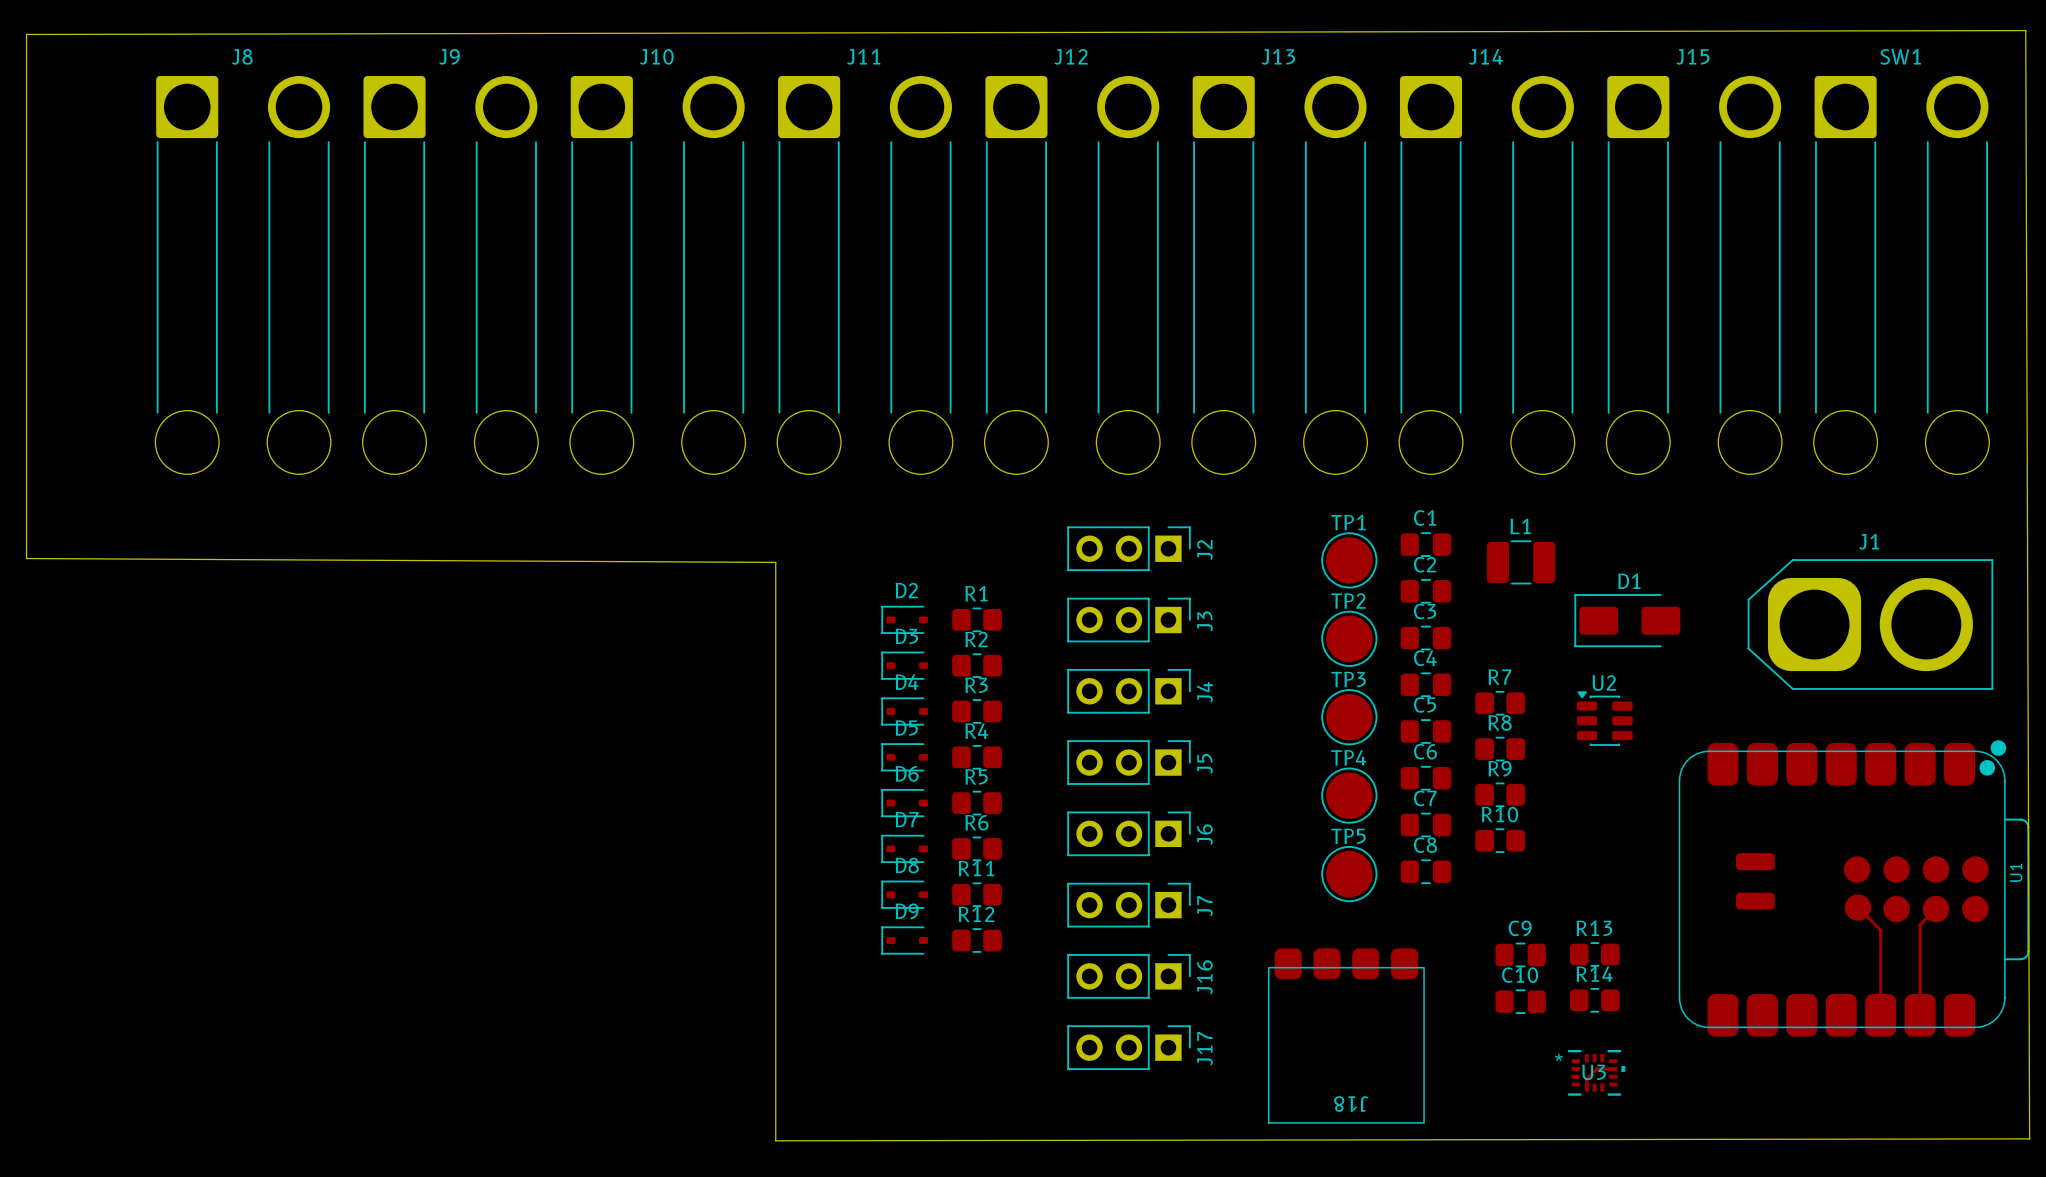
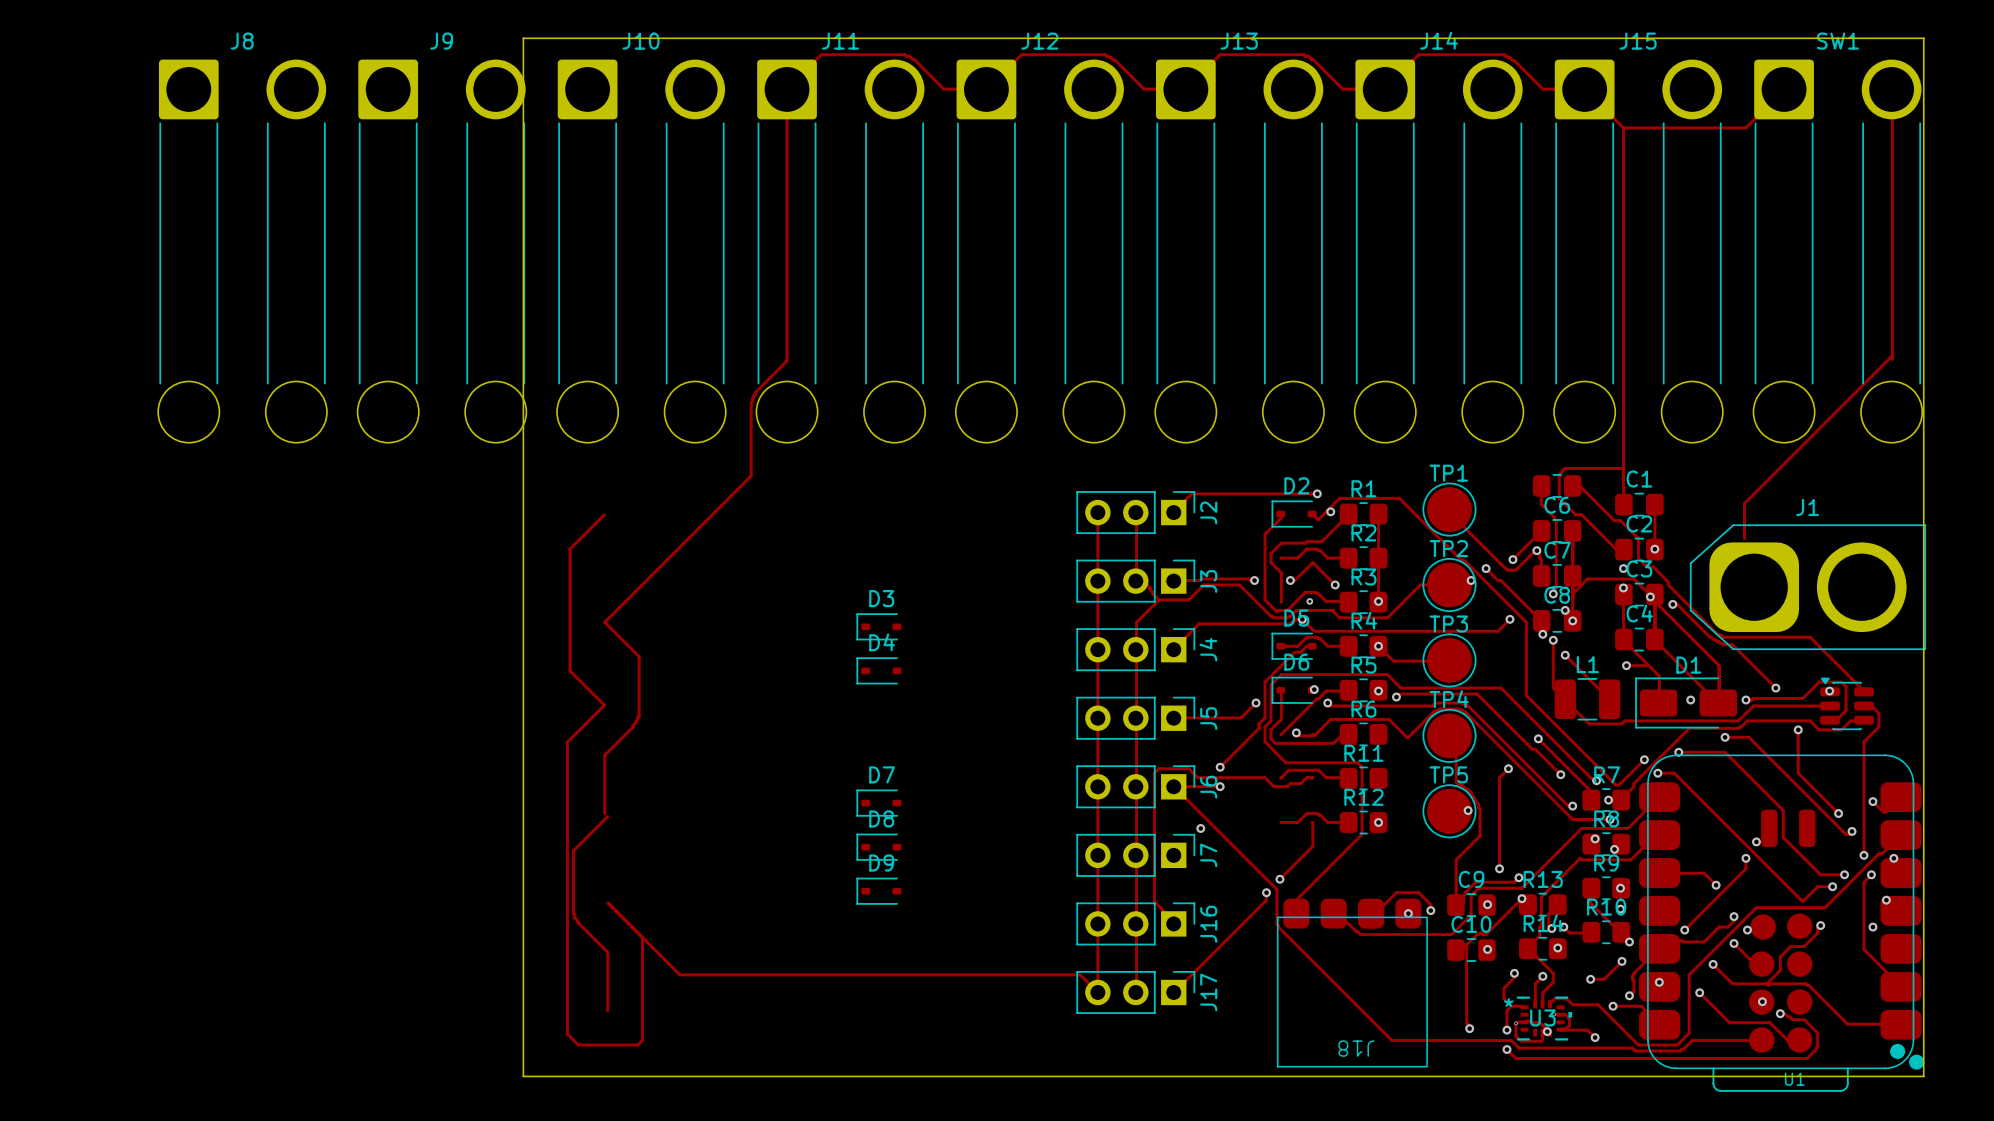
board edge: (2025, 30) (2029, 1138) (775, 1140) (775, 562) (26, 558) (26, 34) (2025, 30) -> (523, 38) (523, 1076) (1923, 1076) (1923, 38) (523, 38)
track: none -> (1784, 89) (1745, 127) (1623, 127)
track: none -> (1892, 89) (1892, 359)
track: none -> (1623, 127) (1623, 504)
track: none -> (1623, 127) (1584, 89) (1542, 89) (1514, 60) (1504, 54) (1418, 54) (1384, 89) (1342, 89) (1312, 59) (1303, 54) (1220, 54) (1185, 89) (1144, 89) (1115, 60) (1105, 54) (1021, 54) (987, 89) (943, 89) (913, 59) (905, 54) (821, 54) (787, 89) (787, 360) (755, 392) (751, 402) (751, 475) (604, 622) (639, 656) (639, 716) (633, 726) (604, 755) (604, 813)
track: none -> (1892, 355) (1744, 503) (1744, 538)
track: none -> (1623, 468) (1565, 468) (1559, 474) (1559, 498) (1575, 514) (1581, 514) (1616, 549) (1623, 549)
track: none -> (1541, 485) (1541, 504) (1556, 520) (1556, 587) (1551, 592)
part: none -> (1557, 485)
track: none -> (1572, 485) (1580, 486) (1614, 520) (1620, 520) (1638, 538) (1638, 558) (1645, 565) (1653, 567) (1668, 582) (1668, 584) (1717, 634) (1723, 637) (1810, 637) (1863, 691)
track: none -> (1317, 493) (1191, 493) (1173, 511)
via: none -> (1317, 493)
track: none -> (1654, 504) (1654, 549)
track: none -> (1449, 509) (1450, 513) (1506, 570) (1515, 570) (1535, 550)
C1 position: (1425, 544) -> (1639, 504)
track: none -> (1097, 512) (1097, 992) (1080, 974) (679, 974) (608, 903)
track: none -> (1136, 511) (1136, 580) (1141, 584) (1147, 584) (1158, 599)
via: none -> (1330, 511)
J2 position: (1129, 548) -> (1135, 512)
track: none -> (1280, 514) (1281, 517) (1265, 534) (1265, 599) (1276, 611) (1287, 610) (1305, 592) (1315, 592) (1326, 601) (1348, 602)
track: none -> (1312, 514) (1318, 519) (1339, 498) (1399, 498) (1526, 622) (1526, 695) (1616, 785) (1619, 785) (1644, 759)
track: none -> (1348, 514) (1321, 541) (1281, 543) (1270, 553) (1270, 562) (1281, 573) (1280, 602)
track: none -> (1378, 514) (1378, 602)
track: none -> (604, 514) (570, 549) (570, 670) (604, 705) (567, 742) (567, 1034) (578, 1045) (637, 1045) (642, 1040) (642, 937)
TP1 position: (1349, 560) -> (1449, 509)
L1 position: (1521, 562) -> (1587, 699)
track: none -> (1541, 530) (1512, 559)
track: none -> (1572, 530) (1572, 620)
via: none -> (1654, 549)
track: none -> (1536, 550) (1541, 559) (1541, 575)
via: none -> (1536, 550)
C2 position: (1425, 591) -> (1639, 549)
track: none -> (1280, 558) (1297, 558) (1306, 549) (1317, 549) (1327, 558) (1348, 558)
via: none -> (1512, 559)
track: none -> (1486, 568) (1498, 580) (1501, 580) (1547, 626) (1547, 629) (1542, 634) (1542, 631)
via: none -> (1486, 568)
via: none -> (1623, 568)
track: none -> (1173, 580) (1250, 580)
via: none -> (1254, 580)
track: none -> (1290, 580) (1294, 580) (1312, 562) (1335, 584)
via: none -> (1290, 580)
via: none -> (1471, 580)
D2 position: (904, 619) -> (1294, 514)
R1 position: (976, 619) -> (1363, 514)
J3 position: (1129, 620) -> (1135, 581)
D1 position: (1627, 620) -> (1686, 703)
via: none -> (1335, 584)
track: none -> (1450, 584) (1420, 584) (1387, 617) (1339, 617) (1333, 610) (1296, 610) (1287, 617) (1273, 617) (1239, 584) (1203, 584) (1188, 599) (1158, 599)
track: none -> (1623, 587) (1623, 640)
via: none -> (1623, 587)
via: none -> (1553, 593)
track: none -> (1572, 593) (1587, 579) (1633, 579) (1648, 593) (1654, 593) (1654, 640) (1719, 703) (1719, 665) (1650, 596)
via: none -> (1650, 596)
track: none -> (1158, 599) (1136, 622) (1136, 992)
TP2 position: (1349, 638) -> (1449, 584)
C3 position: (1425, 638) -> (1639, 594)
via: none -> (1309, 601)
via: none -> (1378, 601)
track: none -> (1674, 602) (1710, 637) (1723, 644) (1732, 644) (1775, 688)
via: none -> (1672, 604)
via: none -> (1565, 610)
via: none -> (1302, 619)
track: none -> (1509, 619) (1498, 631) (1314, 631) (1302, 619) (1296, 619) (1290, 623) (1199, 623) (1173, 649)
via: none -> (1509, 619)
via: none -> (1572, 620)
R2 position: (976, 665) -> (1363, 558)
via: none -> (1542, 634)
track: none -> (1553, 640) (1553, 688) (1589, 723) (1622, 723) (1625, 720) (1738, 720) (1753, 705) (1830, 705)
via: none -> (1553, 640)
track: none -> (1623, 640) (1659, 676) (1658, 703)
C4 position: (1425, 684) -> (1639, 639)
track: none -> (1280, 646) (1297, 646) (1306, 637) (1317, 637) (1327, 646) (1348, 646)
track: none -> (1312, 646) (1306, 646) (1300, 652) (1294, 652) (1265, 682) (1265, 717) (1259, 723) (1259, 728) (1220, 767)
track: none -> (1378, 646) (1393, 661) (1449, 660)
via: none -> (1378, 646)
J4 position: (1129, 691) -> (1135, 649)
track: none -> (1565, 655) (1609, 699)
via: none -> (1565, 655)
R7 position: (1500, 703) -> (1606, 800)
track: none -> (1626, 665) (1648, 665)
via: none -> (1626, 665)
R3 position: (976, 711) -> (1363, 602)
TP3 position: (1349, 717) -> (1449, 660)
U2: (1604, 718) -> none
via: none -> (1775, 688)
via: none -> (1314, 689)
track: none -> (1280, 690) (1281, 719) (1270, 729) (1270, 738) (1275, 743) (1333, 743) (1344, 732) (1348, 734)
track: none -> (1348, 690) (1326, 691) (1280, 734)
C5: (1425, 731) -> none
via: none -> (1378, 691)
via: none -> (1829, 691)
track: none -> (1396, 697) (1399, 694) (1477, 694) (1560, 774)
via: none -> (1396, 697)
via: none -> (1690, 700)
via: none -> (1745, 700)
track: none -> (1747, 701) (1753, 698) (1802, 698) (1819, 682) (1841, 682) (1846, 686) (1846, 710) (1835, 720) (1830, 720)
track: none -> (1256, 703) (1241, 717) (1173, 717)
via: none -> (1256, 703)
track: none -> (1327, 703) (1330, 705) (1432, 705) (1435, 703) (1462, 703) (1468, 705) (1568, 806) (1572, 806)
via: none -> (1327, 703)
part: none -> (1847, 703)
track: none -> (1863, 705) (1871, 705) (1878, 713) (1878, 726) (1863, 741) (1863, 855)
R8 position: (1500, 749) -> (1606, 844)
D5 position: (904, 757) -> (1294, 646)
R4 position: (976, 757) -> (1363, 646)
J5 position: (1129, 762) -> (1135, 718)
track: none -> (1863, 720) (1850, 720) (1841, 729) (1819, 729) (1810, 720) (1747, 720) (1738, 728) (1689, 728) (1633, 783) (1633, 786) (1620, 800)
track: none -> (1798, 729) (1798, 773) (1838, 813)
via: none -> (1798, 729)
track: none -> (1296, 732) (1299, 735) (1314, 735) (1330, 719) (1388, 719) (1408, 737) (1433, 711) (1439, 708) (1459, 708) (1465, 711) (1572, 819) (1610, 819)
via: none -> (1296, 732)
C6 position: (1425, 778) -> (1557, 530)
track: none -> (1449, 735) (1456, 741) (1456, 782) (1471, 792) (1480, 809) (1480, 835) (1456, 859) (1456, 904)
track: none -> (1725, 737) (1748, 737) (1846, 834) (1852, 831)
via: none -> (1725, 737)
track: none -> (1538, 738) (1590, 791) (1591, 800)
via: none -> (1538, 738)
R9 position: (1500, 794) -> (1606, 888)
TP4 position: (1349, 795) -> (1449, 735)
track: none -> (1678, 752) (1725, 752) (1783, 810) (1783, 837) (1820, 874) (1844, 874)
via: none -> (1678, 752)
D6 position: (904, 803) -> (1294, 690)
R5 position: (976, 803) -> (1363, 690)
via: none -> (1644, 759)
via: none -> (1220, 767)
track: none -> (1508, 768) (1499, 777) (1499, 868)
via: none -> (1508, 768)
track: none -> (1657, 773) (1674, 773) (1802, 901) (1817, 886) (1832, 886)
via: none -> (1657, 773)
via: none -> (1560, 774)
track: none -> (1280, 778) (1288, 770) (1318, 770) (1326, 777) (1348, 778)
track: none -> (1312, 778) (1306, 777) (1300, 783) (1290, 783) (1287, 786) (1273, 786) (1265, 777) (1197, 777) (1188, 768) (1158, 768) (1154, 773) (1154, 901) (1173, 921)
C7 position: (1425, 824) -> (1557, 575)
track: none -> (1596, 780) (1593, 780) (1501, 688) (1400, 688) (1387, 674) (1281, 674) (1270, 685) (1270, 720) (1265, 726) (1265, 741) (1285, 762) (1357, 762) (1362, 767) (1362, 834) (1296, 900) (1296, 913)
via: none -> (1596, 780)
track: none -> (1220, 786) (1173, 786) (1276, 889) (1278, 927) (1391, 1040) (1511, 1040) (1518, 1048) (1632, 1048) (1635, 1051) (1680, 1051) (1692, 1040) (1761, 1040)
via: none -> (1220, 786)
J6 position: (1129, 833) -> (1135, 786)
R10 position: (1500, 840) -> (1606, 932)
track: none -> (1659, 797) (1627, 828) (1581, 828) (1521, 888) (1478, 888) (1471, 895) (1471, 915) (1451, 934) (1360, 934) (1338, 913) (1333, 913)
via: none -> (1608, 800)
track: none -> (1872, 801) (1883, 812) (1886, 812)
via: none -> (1872, 801)
R6 position: (976, 848) -> (1363, 734)
via: none -> (1572, 806)
via: none -> (1468, 810)
via: none -> (1838, 813)
track: none -> (607, 816) (573, 850) (573, 913) (577, 922) (607, 952) (607, 1010)
via: none -> (1610, 819)
track: none -> (1280, 822) (1297, 822) (1306, 813) (1317, 813) (1327, 822) (1348, 822)
track: none -> (1312, 822) (1312, 846) (1279, 879)
via: none -> (1378, 822)
C8 position: (1425, 871) -> (1557, 620)
TP5 position: (1349, 874) -> (1449, 811)
via: none -> (1200, 828)
via: none -> (1852, 831)
track: none -> (1659, 835) (1656, 834) (1630, 859) (1580, 858) (1541, 897) (1539, 936) (1527, 947)
track: none -> (1901, 835) (1881, 853) (1878, 853) (1825, 907) (1756, 907) (1689, 974) (1689, 1033) (1677, 1045) (1638, 1045) (1598, 1004) (1572, 1004) (1566, 998) (1554, 998) (1550, 1004)
via: none -> (1595, 838)
U1 rotation: 0° (1854, 888) -> 90° clockwise (1781, 923)
via: none -> (1756, 841)
R11 position: (976, 894) -> (1363, 778)
via: none -> (1614, 849)
via: none -> (1863, 855)
J7 position: (1129, 905) -> (1135, 855)
track: none -> (1745, 858) (1745, 868) (1684, 930)
via: none -> (1745, 858)
via: none -> (1893, 858)
track: (1858, 907) (1880, 930) (1880, 1015) -> none
track: (1936, 909) (1920, 924) (1920, 1015) -> none
via: none -> (1499, 868)
track: none -> (1659, 873) (1704, 873) (1716, 885)
via: none -> (1844, 874)
track: none -> (1871, 874) (1863, 882) (1863, 949) (1901, 986)
via: none -> (1871, 874)
track: none -> (1518, 877) (1514, 882) (1475, 882) (1465, 892) (1463, 903) (1456, 904)
via: none -> (1518, 877)
via: none -> (1279, 879)
via: none -> (1716, 885)
via: none -> (1832, 886)
track: none -> (1591, 888) (1590, 903) (1629, 941)
via: none -> (1620, 888)
R12 position: (976, 940) -> (1363, 822)
track: none -> (1266, 892) (1266, 900) (1173, 992)
via: none -> (1266, 892)
via: none -> (1521, 898)
via: none -> (1886, 900)
via: none -> (1487, 904)
track: none -> (1527, 904) (1521, 898) (1486, 934) (1477, 934) (1462, 949) (1455, 950)
track: none -> (1557, 904) (1548, 913) (1548, 925) (1551, 928)
via: none -> (1620, 909)
track: none -> (1430, 910) (1430, 904) (1418, 892) (1396, 892) (1375, 913) (1371, 913)
via: none -> (1430, 910)
via: none -> (1408, 913)
track: none -> (1734, 916) (1734, 921) (1728, 927) (1719, 927) (1704, 941) (1683, 941) (1671, 937) (1659, 949)
via: none -> (1734, 916)
J16 position: (1129, 976) -> (1135, 923)
track: none -> (1820, 925) (1817, 928) (1817, 933) (1804, 946) (1790, 946) (1780, 956) (1780, 970) (1766, 983)
via: none -> (1820, 925)
track: none -> (1563, 927) (1569, 933) (1591, 932)
via: none -> (1563, 927)
via: none -> (1872, 927)
via: none -> (1551, 928)
via: none -> (1684, 930)
via: none -> (1747, 930)
via: none -> (1629, 941)
track: none -> (1734, 943) (1754, 964) (1761, 964)
via: none -> (1734, 943)
track: none -> (1466, 944) (1466, 1022) (1469, 1028)
track: none -> (1527, 947) (1553, 973) (1553, 982) (1542, 992) (1542, 1004)
via: none -> (1557, 947)
via: none -> (1487, 949)
track: none -> (1659, 949) (1633, 973) (1633, 991) (1629, 995)
track: none -> (1622, 961) (1604, 979) (1590, 979)
via: none -> (1622, 961)
track: none -> (1713, 964) (1732, 983) (1766, 983)
via: none -> (1713, 964)
via: none -> (1514, 973)
track: none -> (1542, 976) (1535, 983) (1535, 1004)
via: none -> (1542, 976)
track: none -> (1514, 977) (1504, 988) (1504, 998) (1511, 1006)
via: none -> (1590, 979)
via: none -> (1659, 982)
J18 position: (1346, 1036) -> (1352, 983)
track: none -> (1766, 983) (1808, 985) (1847, 1024) (1901, 1024)
track: none -> (1699, 992) (1729, 1022) (1769, 1022) (1787, 1040) (1799, 1040)
via: none -> (1699, 992)
J17 position: (1129, 1047) -> (1135, 992)
via: none -> (1629, 995)
via: none -> (1762, 1001)
track: none -> (1511, 1006) (1524, 1007)
track: none -> (1511, 1006) (1506, 1010) (1506, 1030)
track: none -> (1613, 1006) (1641, 1006) (1659, 1024)
via: none -> (1613, 1006)
via: none -> (1780, 1013)
track: none -> (1784, 1013) (1792, 1019) (1804, 1019) (1817, 1033) (1817, 1046) (1807, 1058) (1515, 1058) (1506, 1049)
via: none -> (1554, 1014)
track: (1613, 1068) (1596, 1068) (1586, 1079) (1586, 1087) -> (1560, 1014) (1560, 1014) (1554, 1014) (1565, 1014) (1569, 1019) (1568, 1026) (1560, 1030)
via: none -> (1515, 1023)
via: none -> (1469, 1028)
via: none -> (1506, 1030)
track: none -> (1560, 1030) (1587, 1030) (1595, 1037)
via: none -> (1547, 1031)
track: none -> (1542, 1032) (1541, 1041) (1521, 1041) (1516, 1036) (1516, 1023) (1526, 1021) (1539, 1022) (1550, 1033)
via: none -> (1595, 1037)
via: none -> (1506, 1049)

